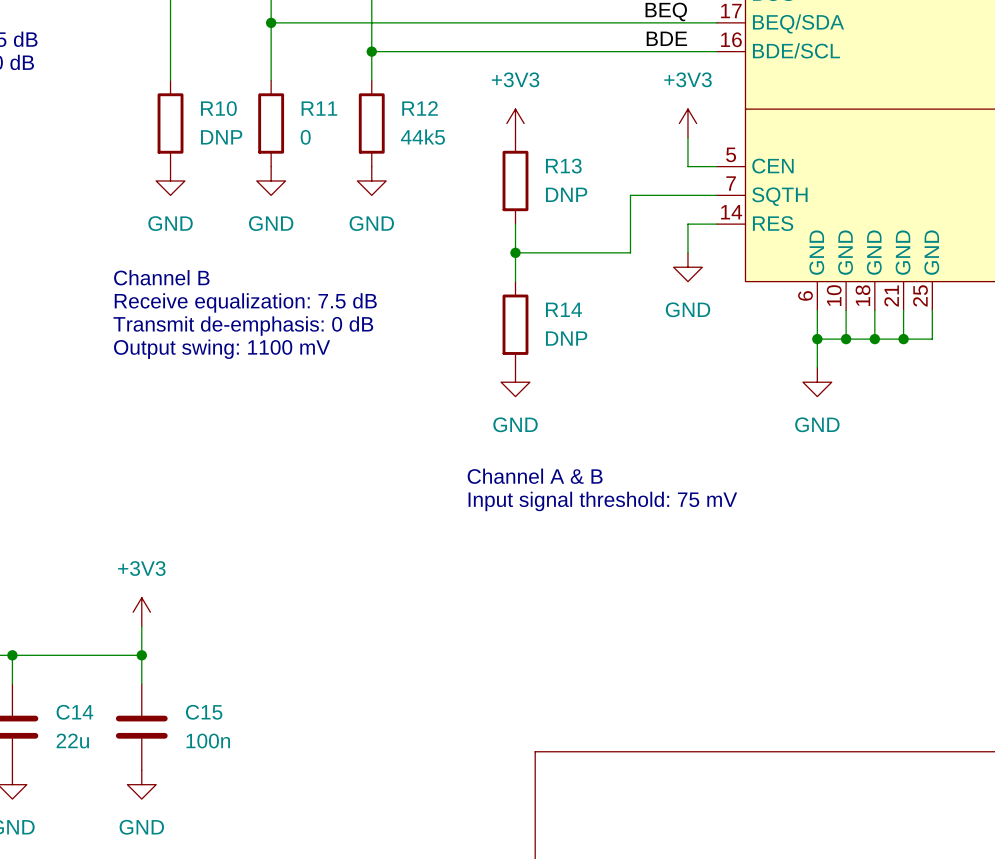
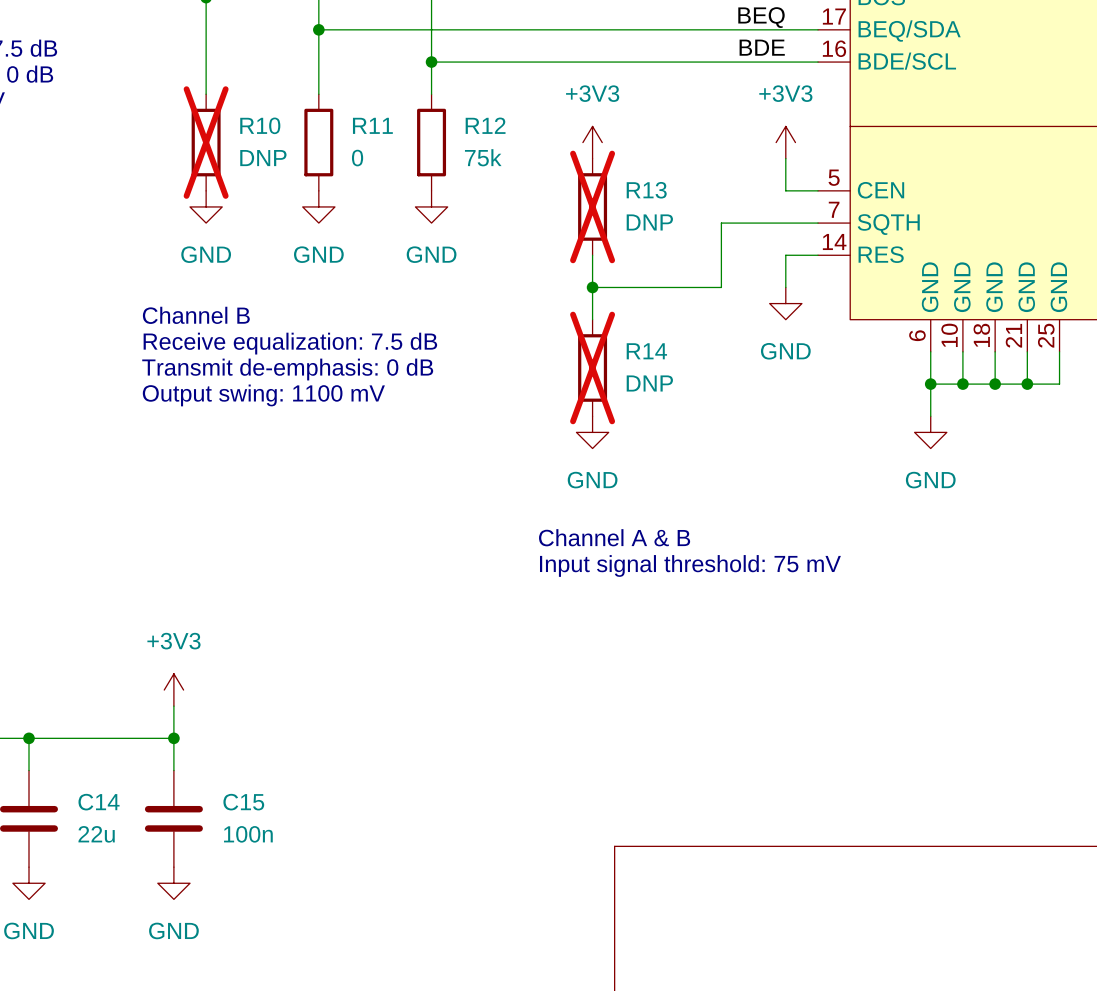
R10 do-not-place cross: none -> (206, 142)
R12 value: 44k5 (422, 137) -> 75k (483, 157)
R13 do-not-place cross: none -> (592, 206)
R14 do-not-place cross: none -> (592, 367)

